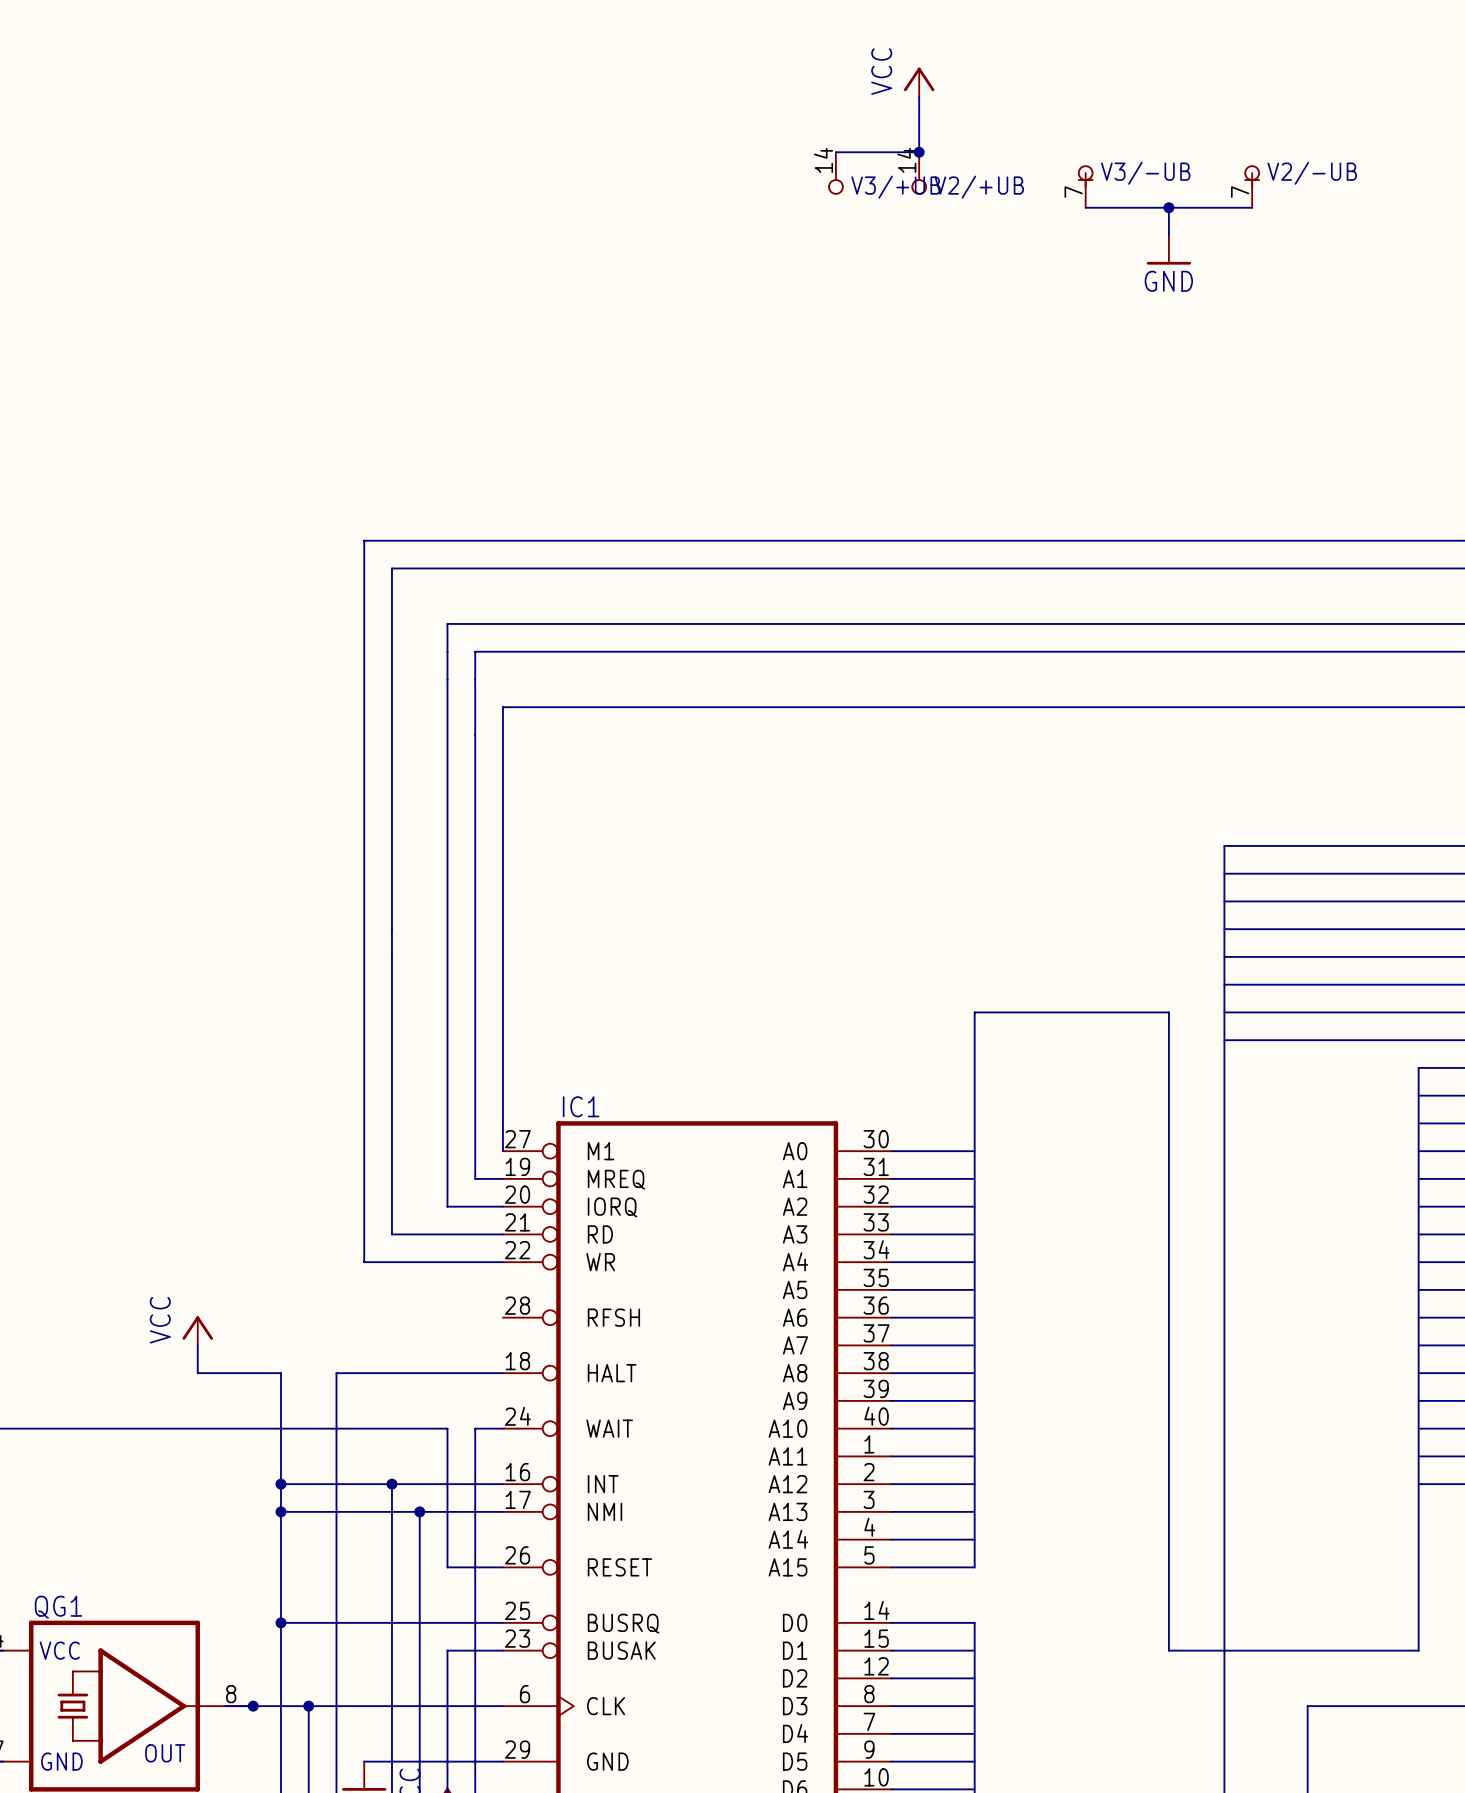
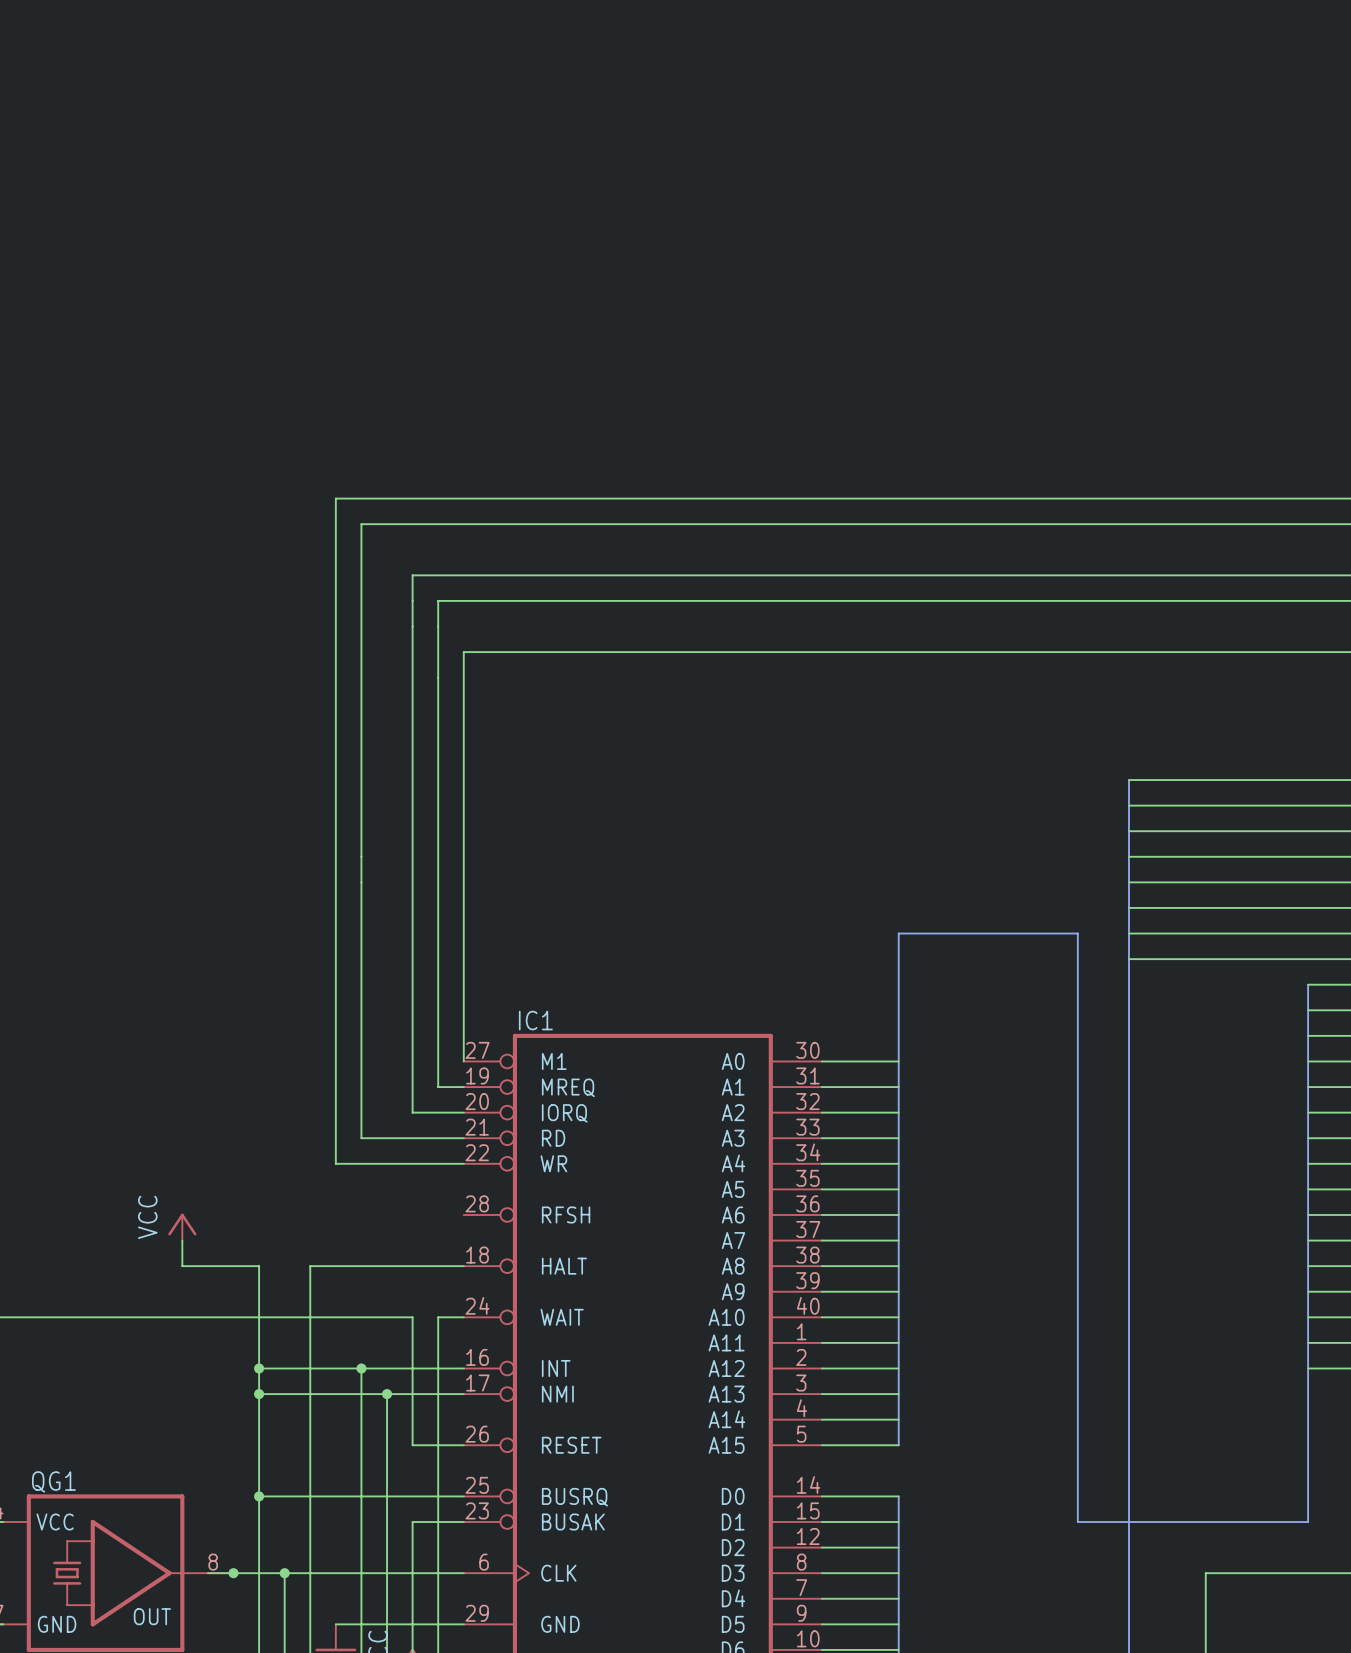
power symbol: VCC (919, 82) -> none
wire: (919, 96) (919, 152) (835, 152) -> none
junction: (919, 152) -> none
V3/+UB: (835, 173) -> none
V2/+UB: (919, 173) -> none
V3/-UB: (1085, 186) -> none
V2/-UB: (1252, 186) -> none
wire: (1085, 207) (1252, 207) -> none
wire: (1168, 207) (1168, 235) -> none
junction: (1168, 207) -> none
power symbol: GND (1168, 250) -> none

